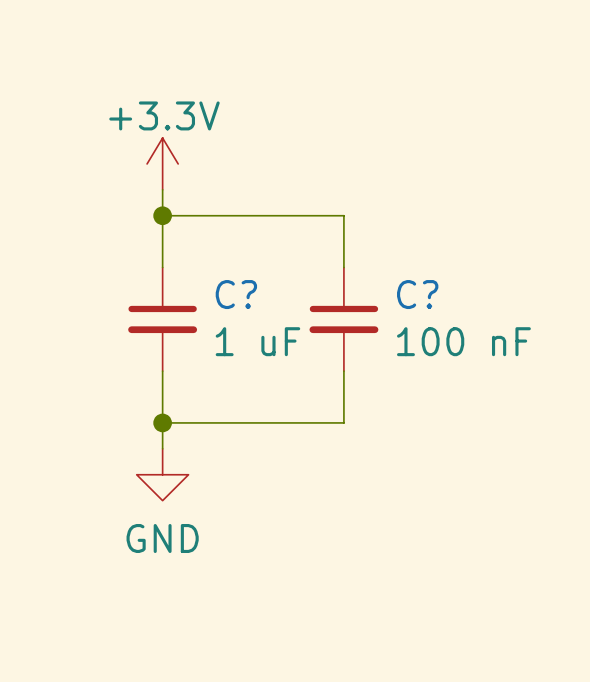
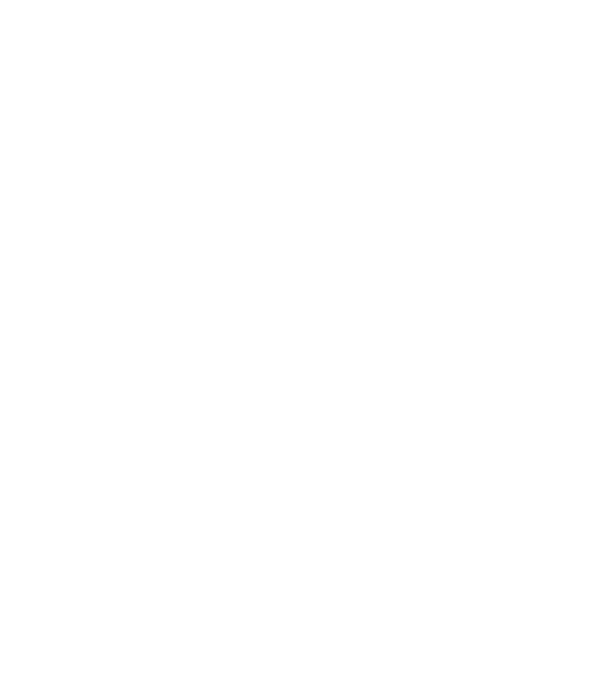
power symbol: +3.3V (162, 163) -> none
wire: (162, 189) (162, 267) -> none
wire: (162, 215) (343, 215) (343, 267) -> none
junction: (162, 215) -> none
C?: 1 uF (162, 319) -> none
C?: 100 nF (343, 319) -> none
wire: (162, 371) (162, 448) -> none
wire: (343, 371) (343, 422) (162, 422) -> none
junction: (162, 422) -> none
power symbol: GND (162, 474) -> none

